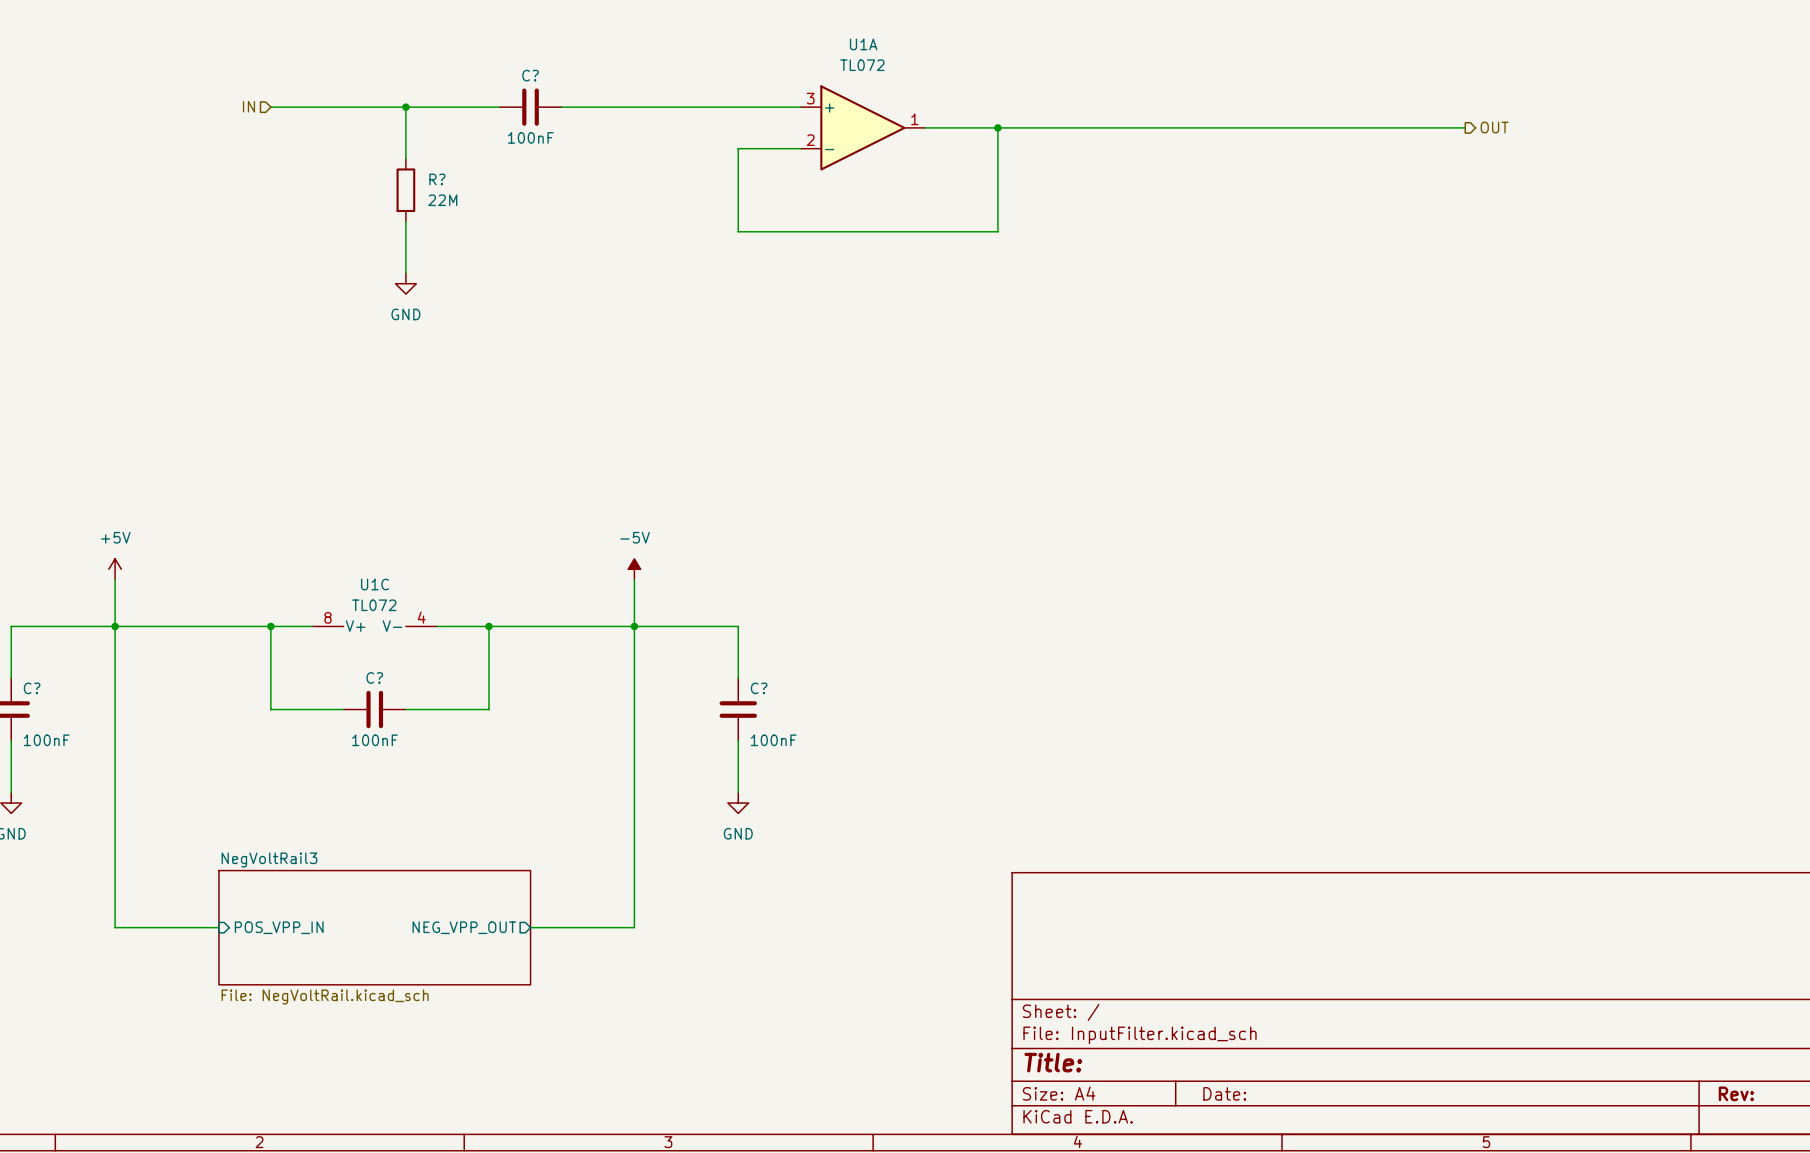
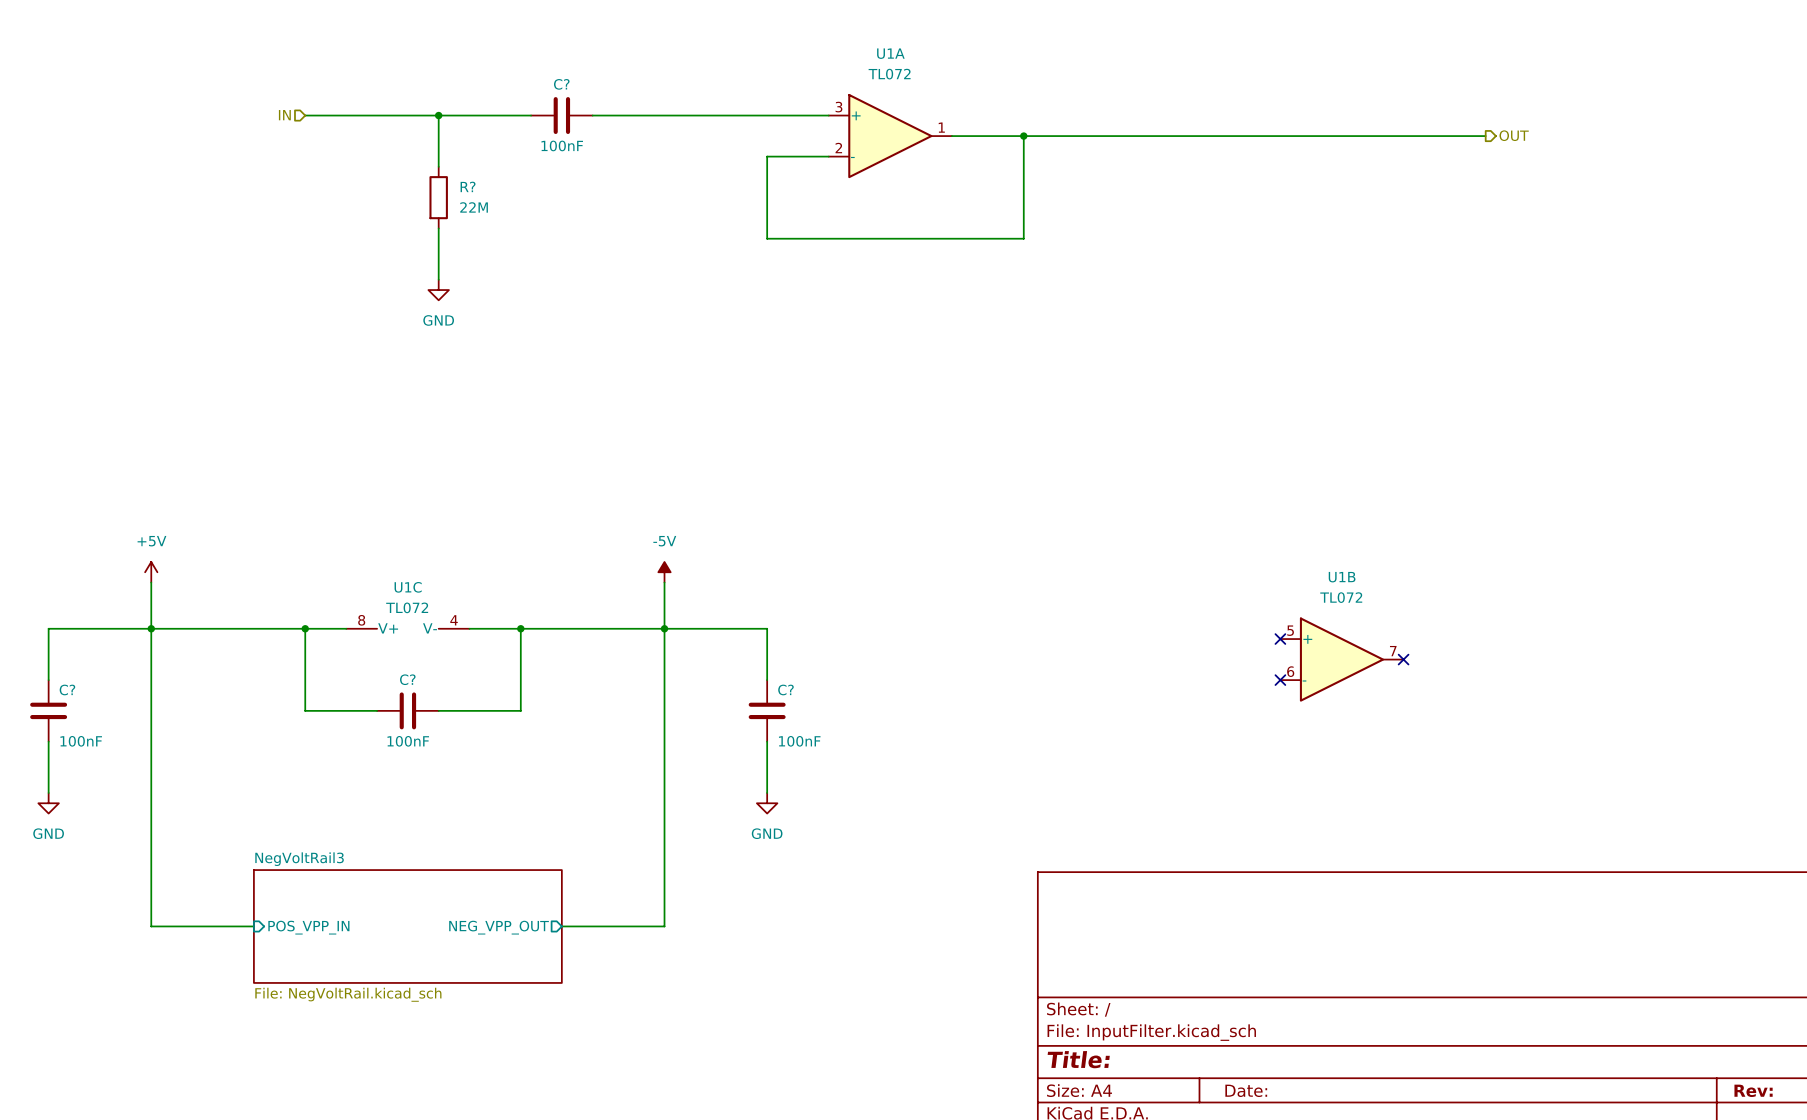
no-connect mark: none -> (1280, 639)
U1B: none -> TL072 (1341, 659)
no-connect mark: none -> (1403, 659)
no-connect mark: none -> (1280, 680)

